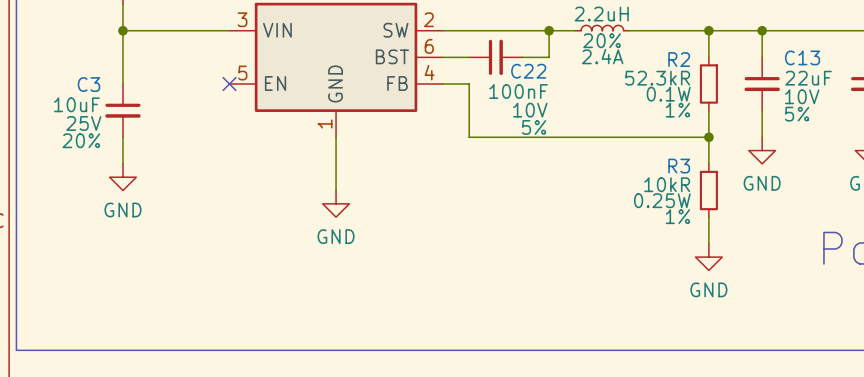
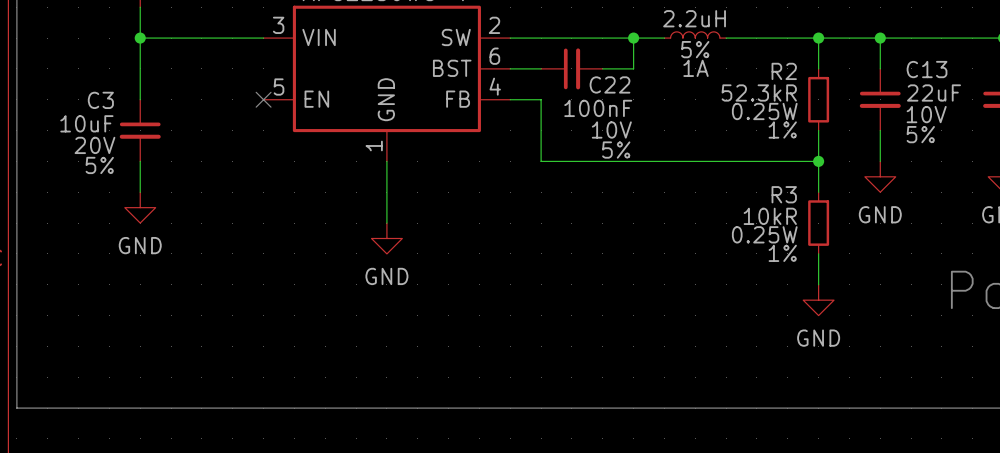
part text: 20% (602, 40) -> 5% (695, 49)
part text: 2.4A (602, 56) -> 1A (696, 68)
R2 text: 0.1W (668, 94) -> 0.25W (764, 111)
C3 text: 25V (83, 123) -> 20V (94, 145)
C3 text: 20% (81, 140) -> 5% (99, 165)

